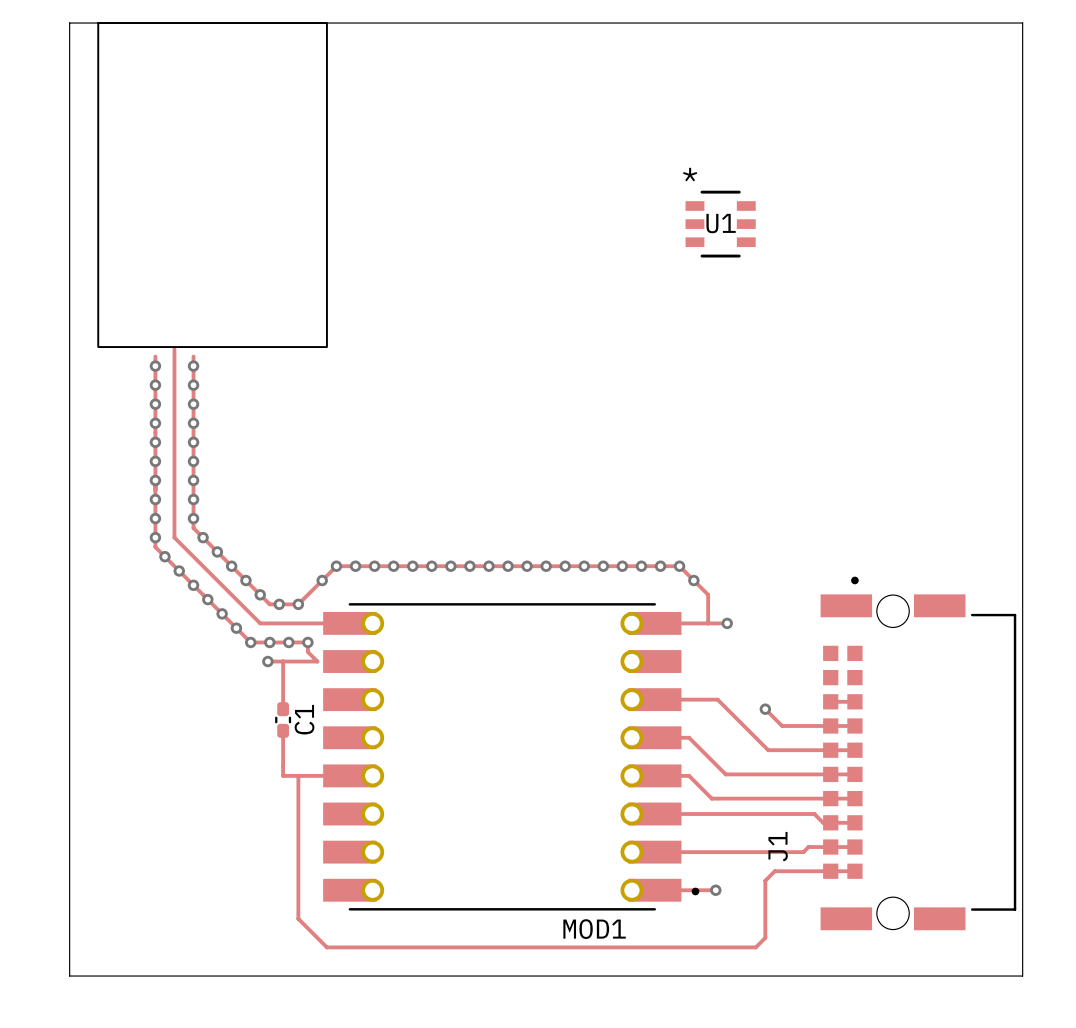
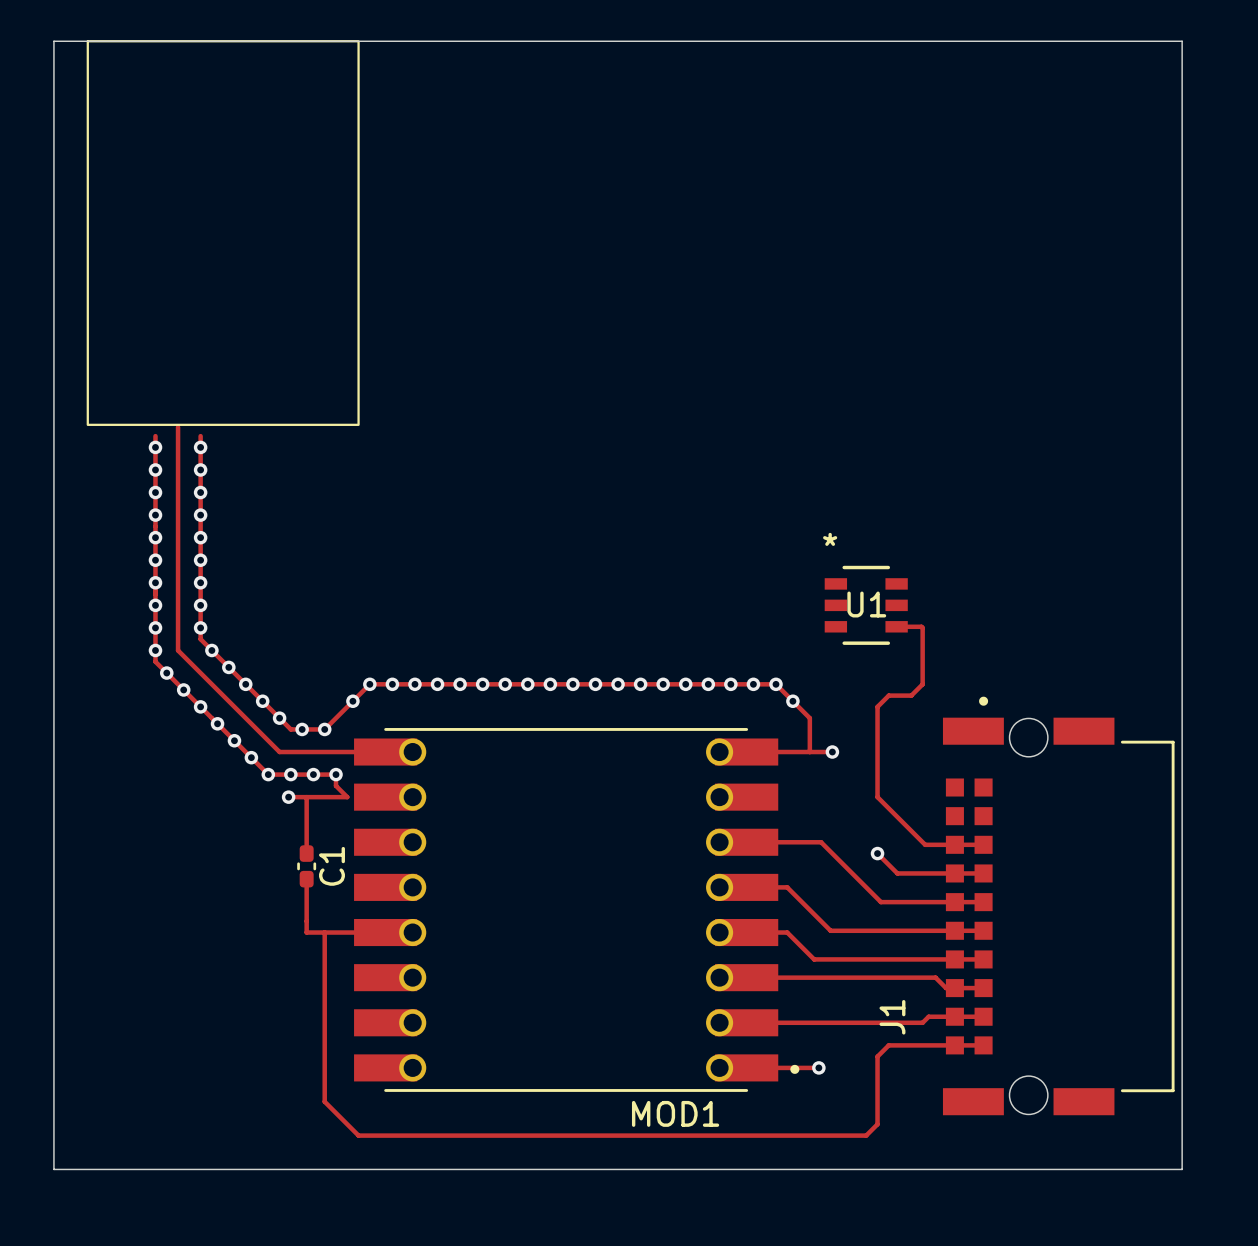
U1 position: (720, 224) -> (866, 605)
track: none -> (896, 626) (922, 627) (922, 684) (911, 695) (888, 695) (877, 706) (877, 797) (925, 844) (954, 844)

